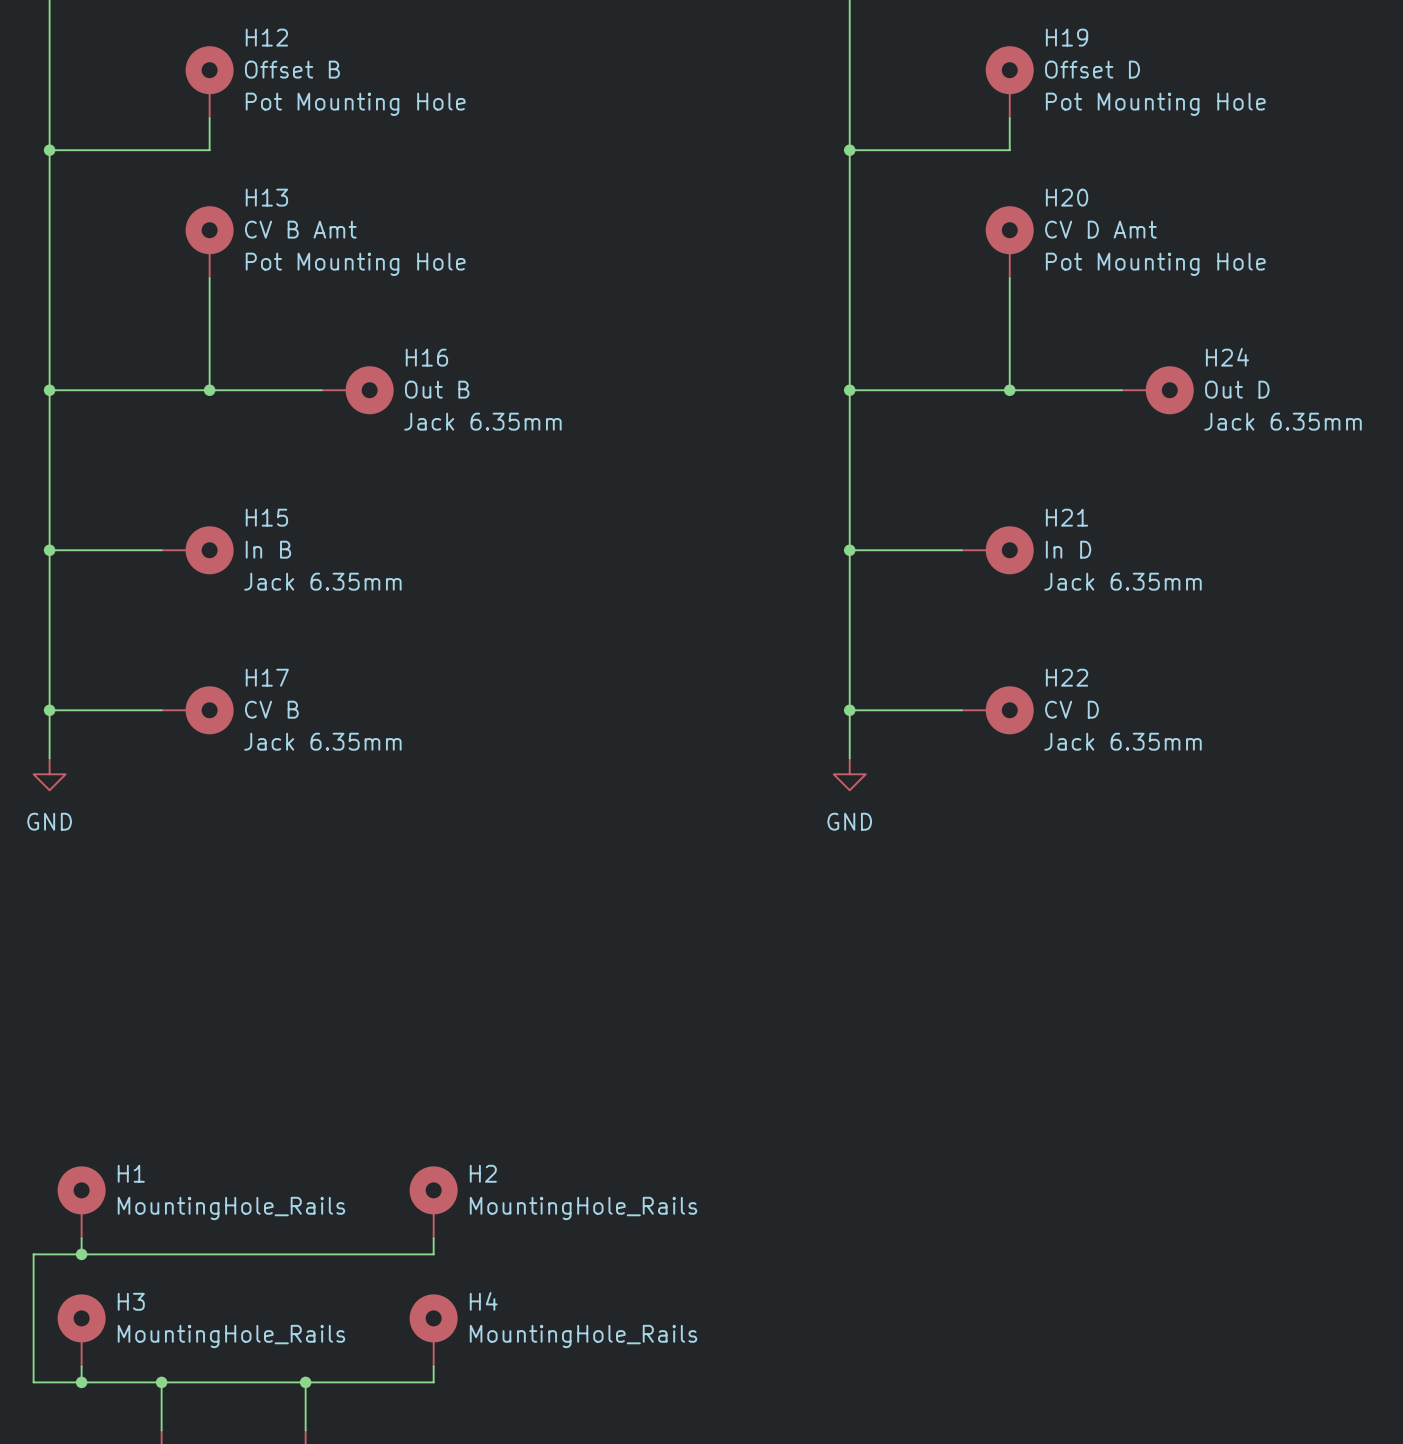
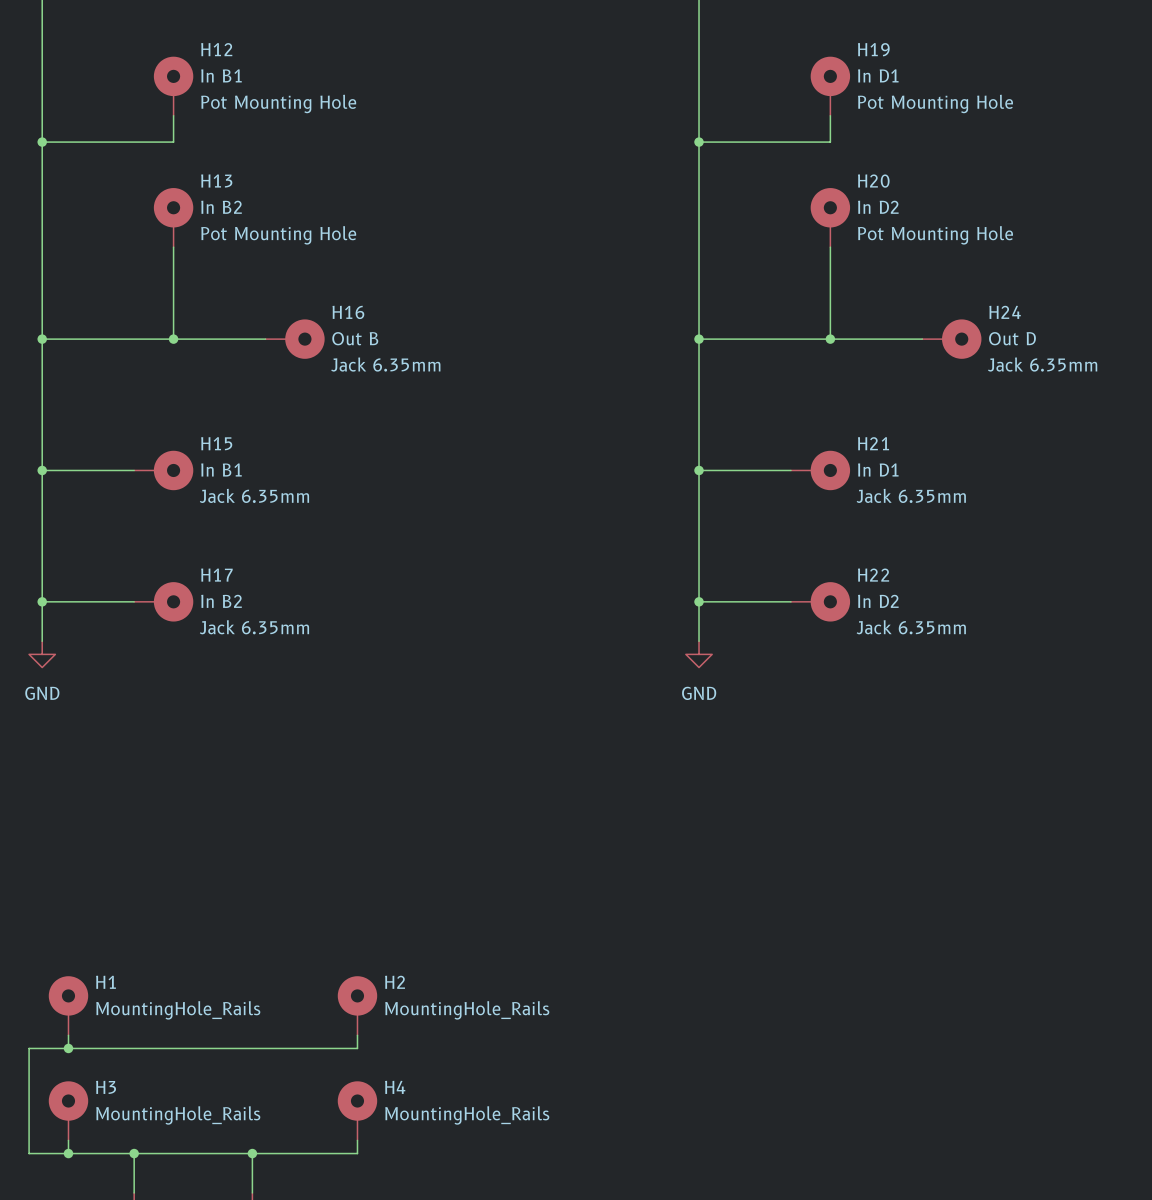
H12 value: Offset B (292, 69) -> In B1 (221, 75)
H19 value: Offset D (1092, 69) -> In D1 (878, 75)
H13 value: CV B Amt (300, 229) -> In B2 (221, 207)
H20 value: CV D Amt (1100, 229) -> In D2 (878, 207)
H15 value: In B (268, 549) -> In B1 (221, 469)
H21 value: In D (1068, 549) -> In D1 (878, 469)
H17 value: CV B (271, 709) -> In B2 (221, 601)
H22 value: CV D (1071, 709) -> In D2 (878, 601)

